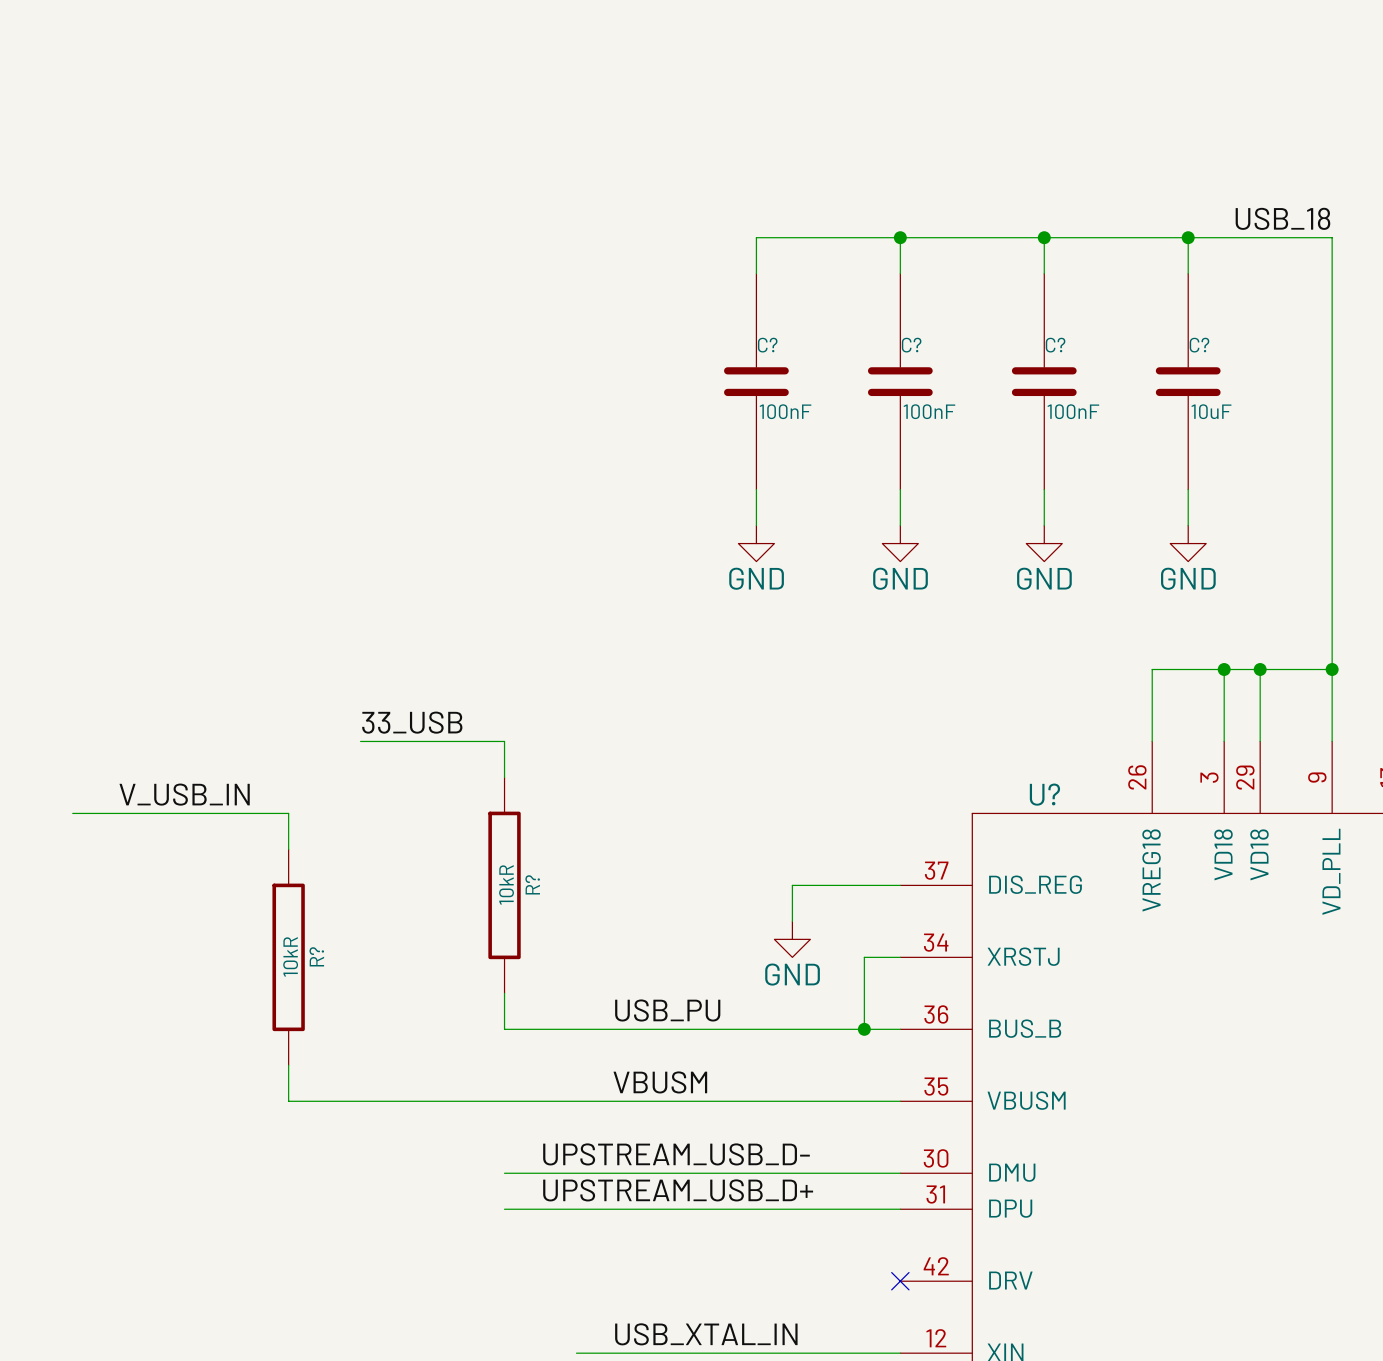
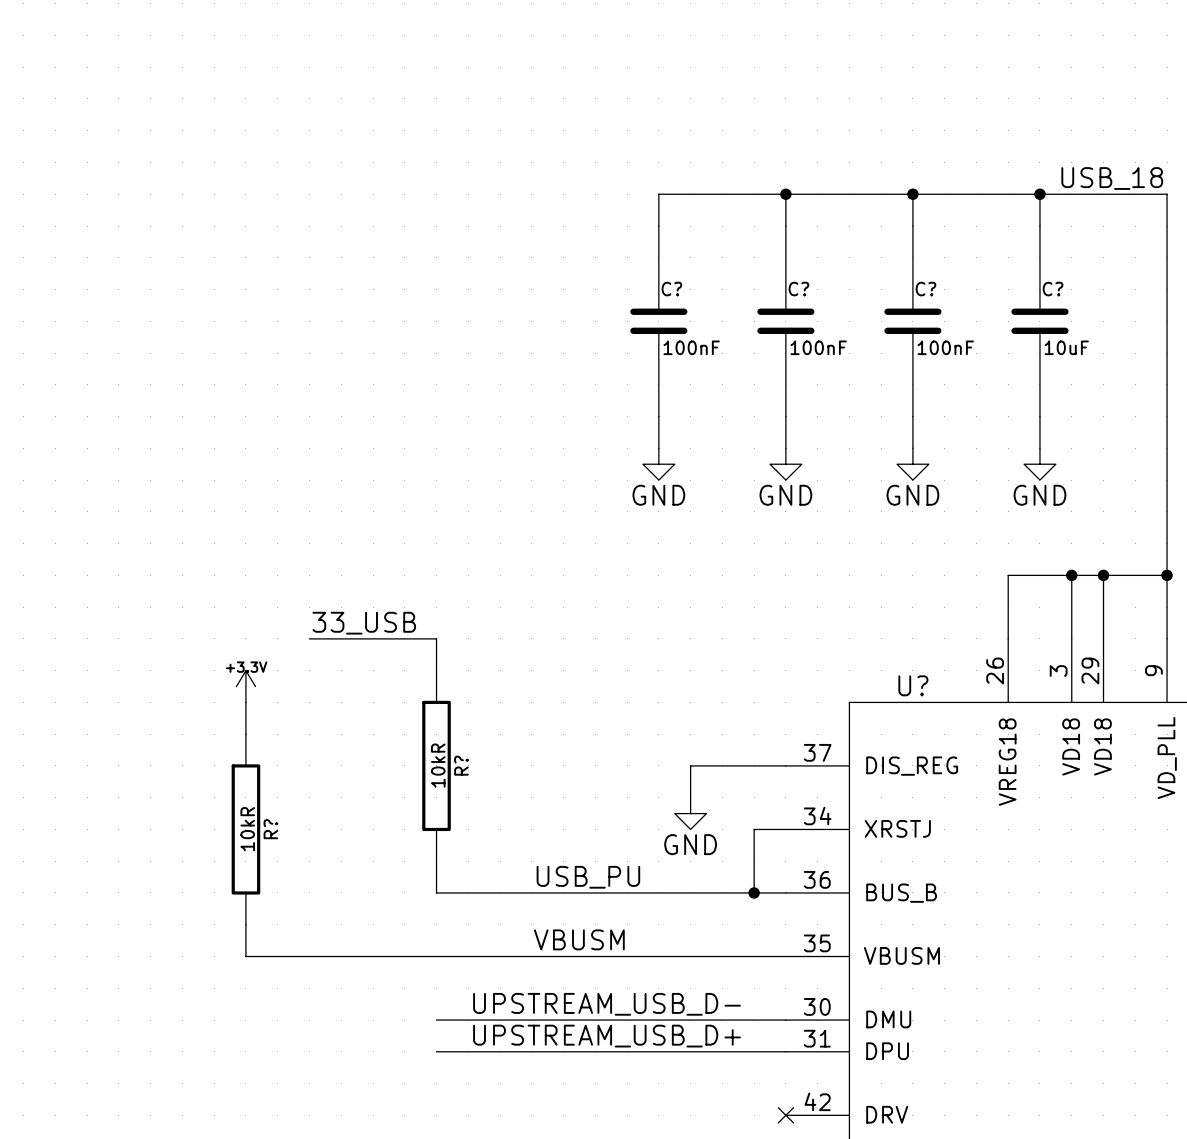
label: V_USB_IN (184, 794) -> none
power symbol: none -> +3.3V (245, 686)
wire: (72, 813) (288, 813) -> none

